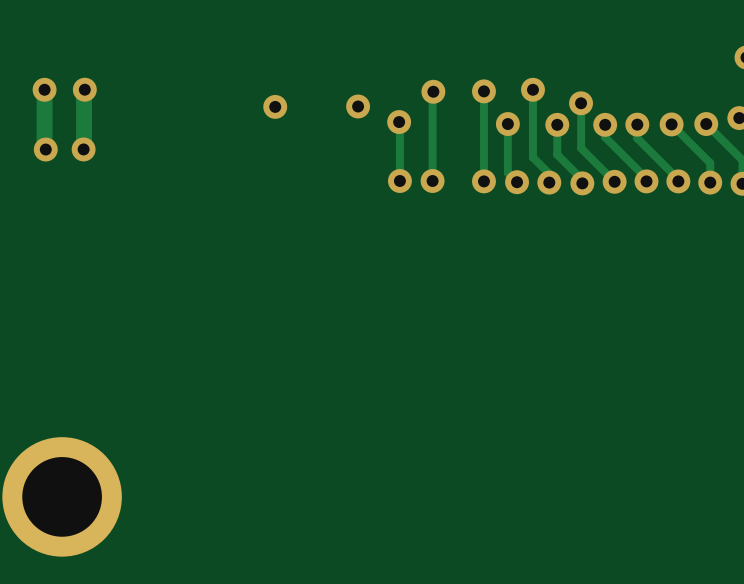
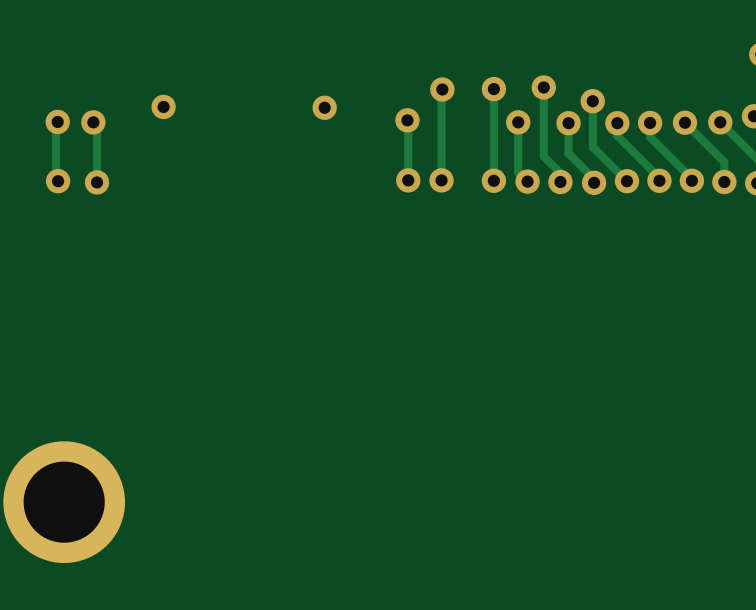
track: (44, 89) (45, 149) -> none
via: (44, 89) -> none
track: (84, 89) (84, 149) -> none
via: (84, 89) -> none
via: (275, 106) -> none
via: (358, 106) -> none
via: none -> (163, 106)
via: none -> (324, 107)
via: none -> (57, 121)
track: none -> (58, 122) (56, 124) (56, 179) (58, 181)
track: none -> (93, 122) (97, 126) (97, 182)
via: none -> (93, 122)
via: (45, 149) -> none
via: (83, 149) -> none
via: none -> (58, 181)
via: none -> (97, 182)

